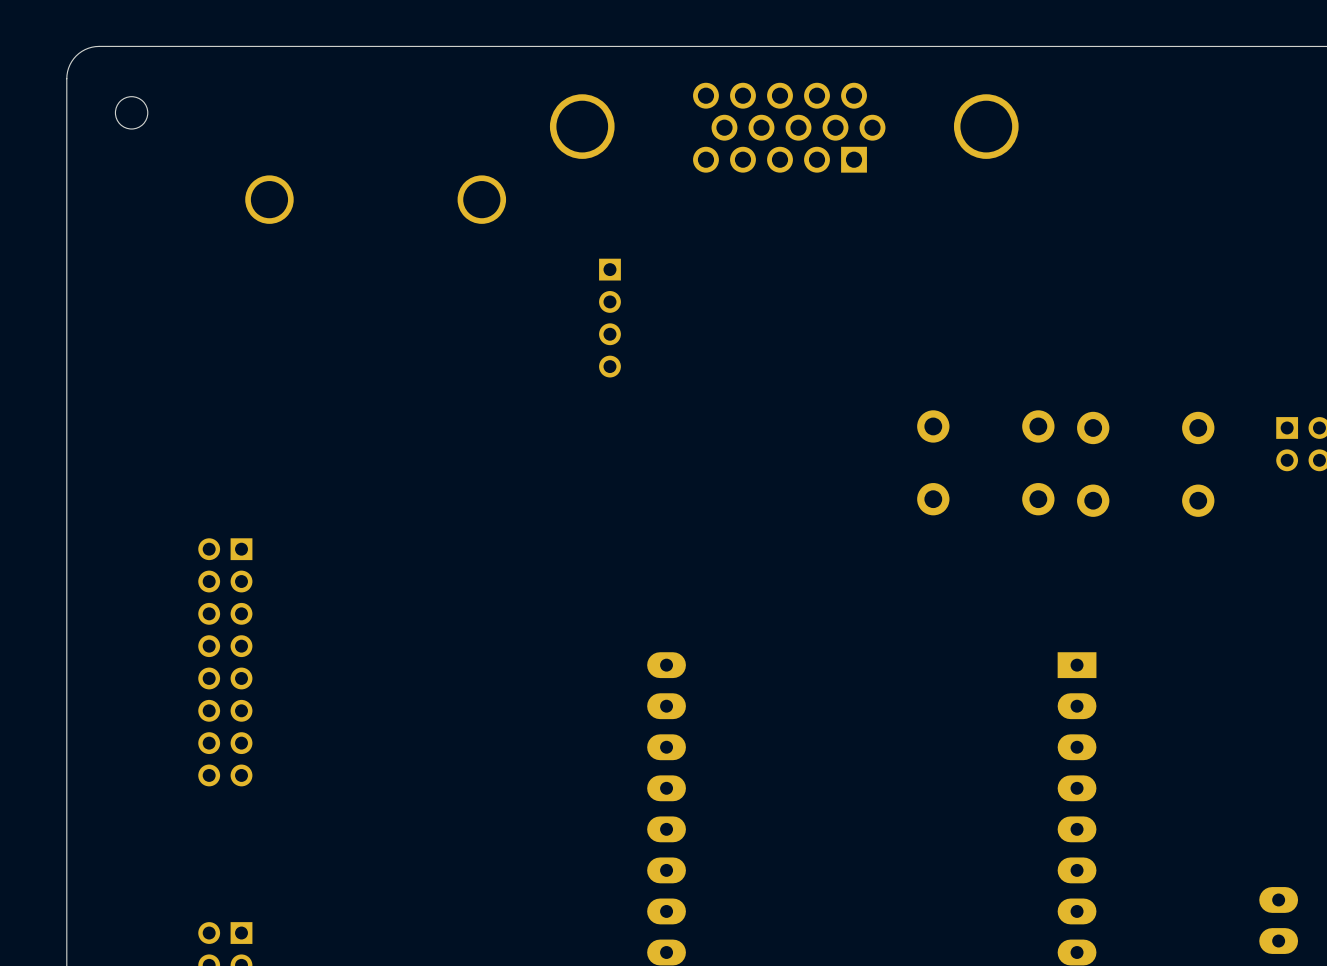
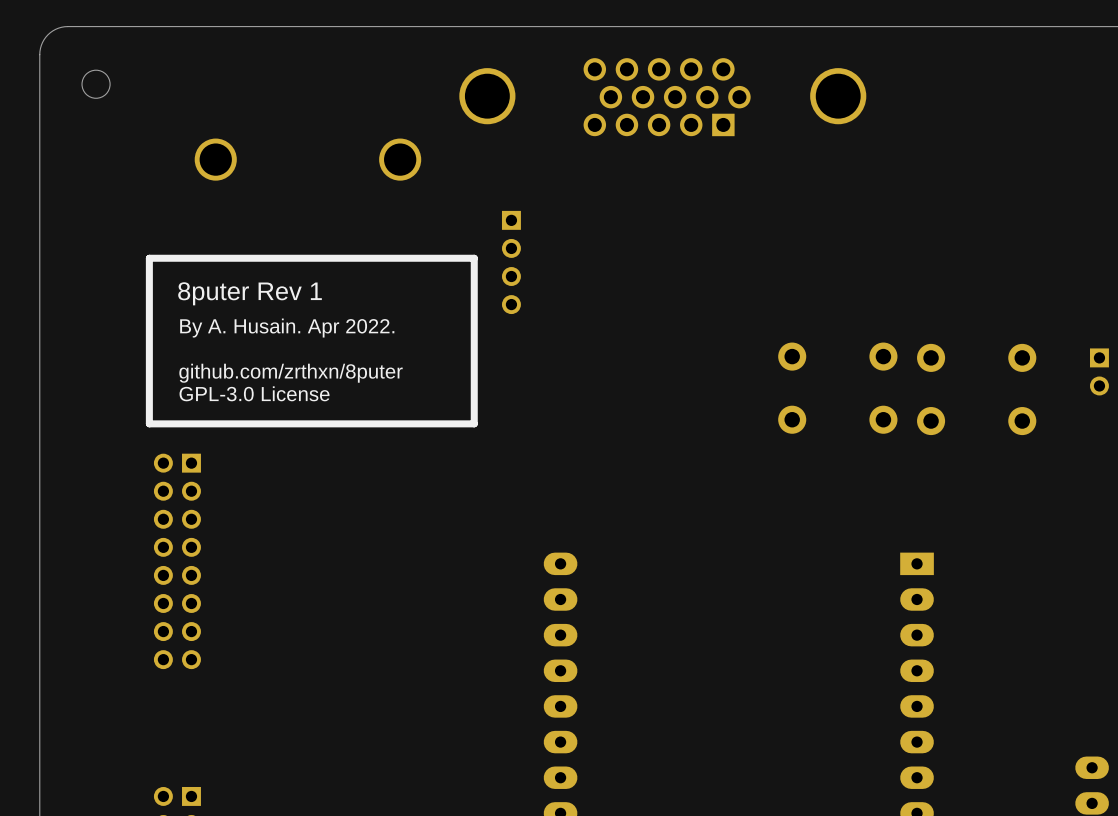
line: none -> (474, 258) (474, 423) (149, 423) (149, 258) (474, 258)
text: none -> 8puter Rev 1 (250, 293)
text: none -> By A. Husain. Apr 2022. (287, 328)
text: none -> github.com/zrthxn/8puter (291, 373)
text: none -> GPL-3.0 License (254, 393)

